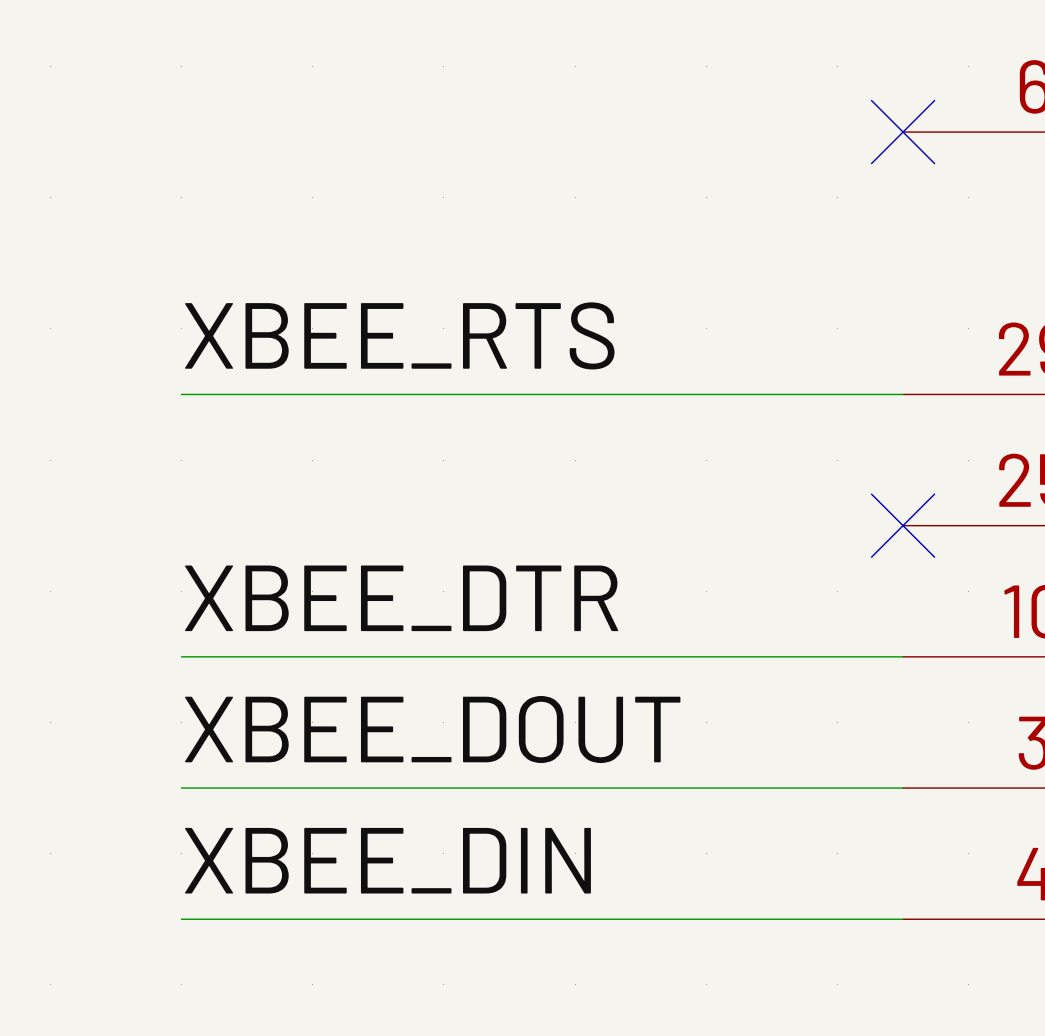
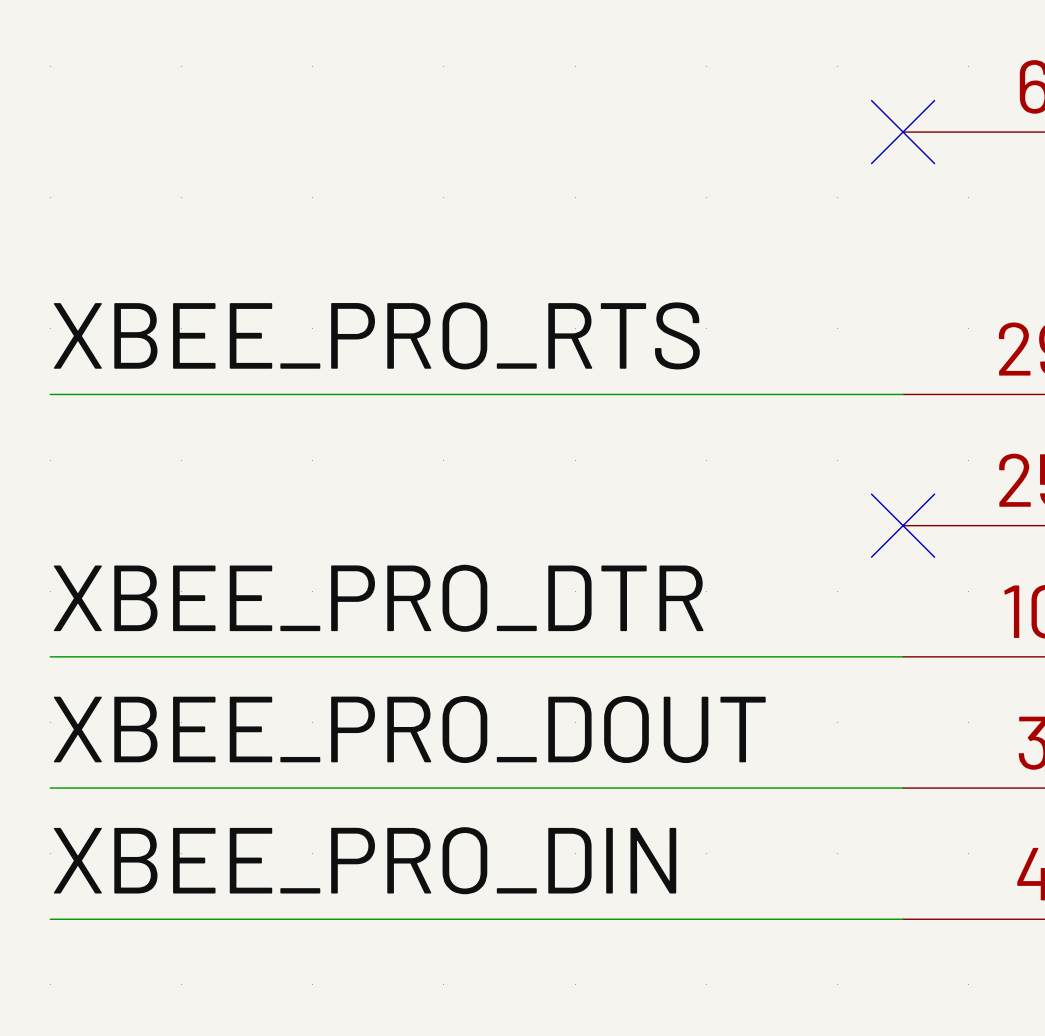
label: XBEE_RTS (399, 335) -> XBEE_PRO_RTS (376, 335)
wire: none -> (50, 394) (181, 394)
label: none -> XBEE_PRO_DTR (378, 598)
label: XBEE_DTR (401, 598) -> none
wire: none -> (50, 656) (181, 656)
label: none -> XBEE_PRO_DOUT (409, 729)
label: XBEE_DOUT (432, 729) -> none
wire: none -> (50, 788) (181, 788)
label: XBEE_DIN (387, 860) -> XBEE_PRO_DIN (364, 860)
wire: none -> (50, 919) (181, 919)

